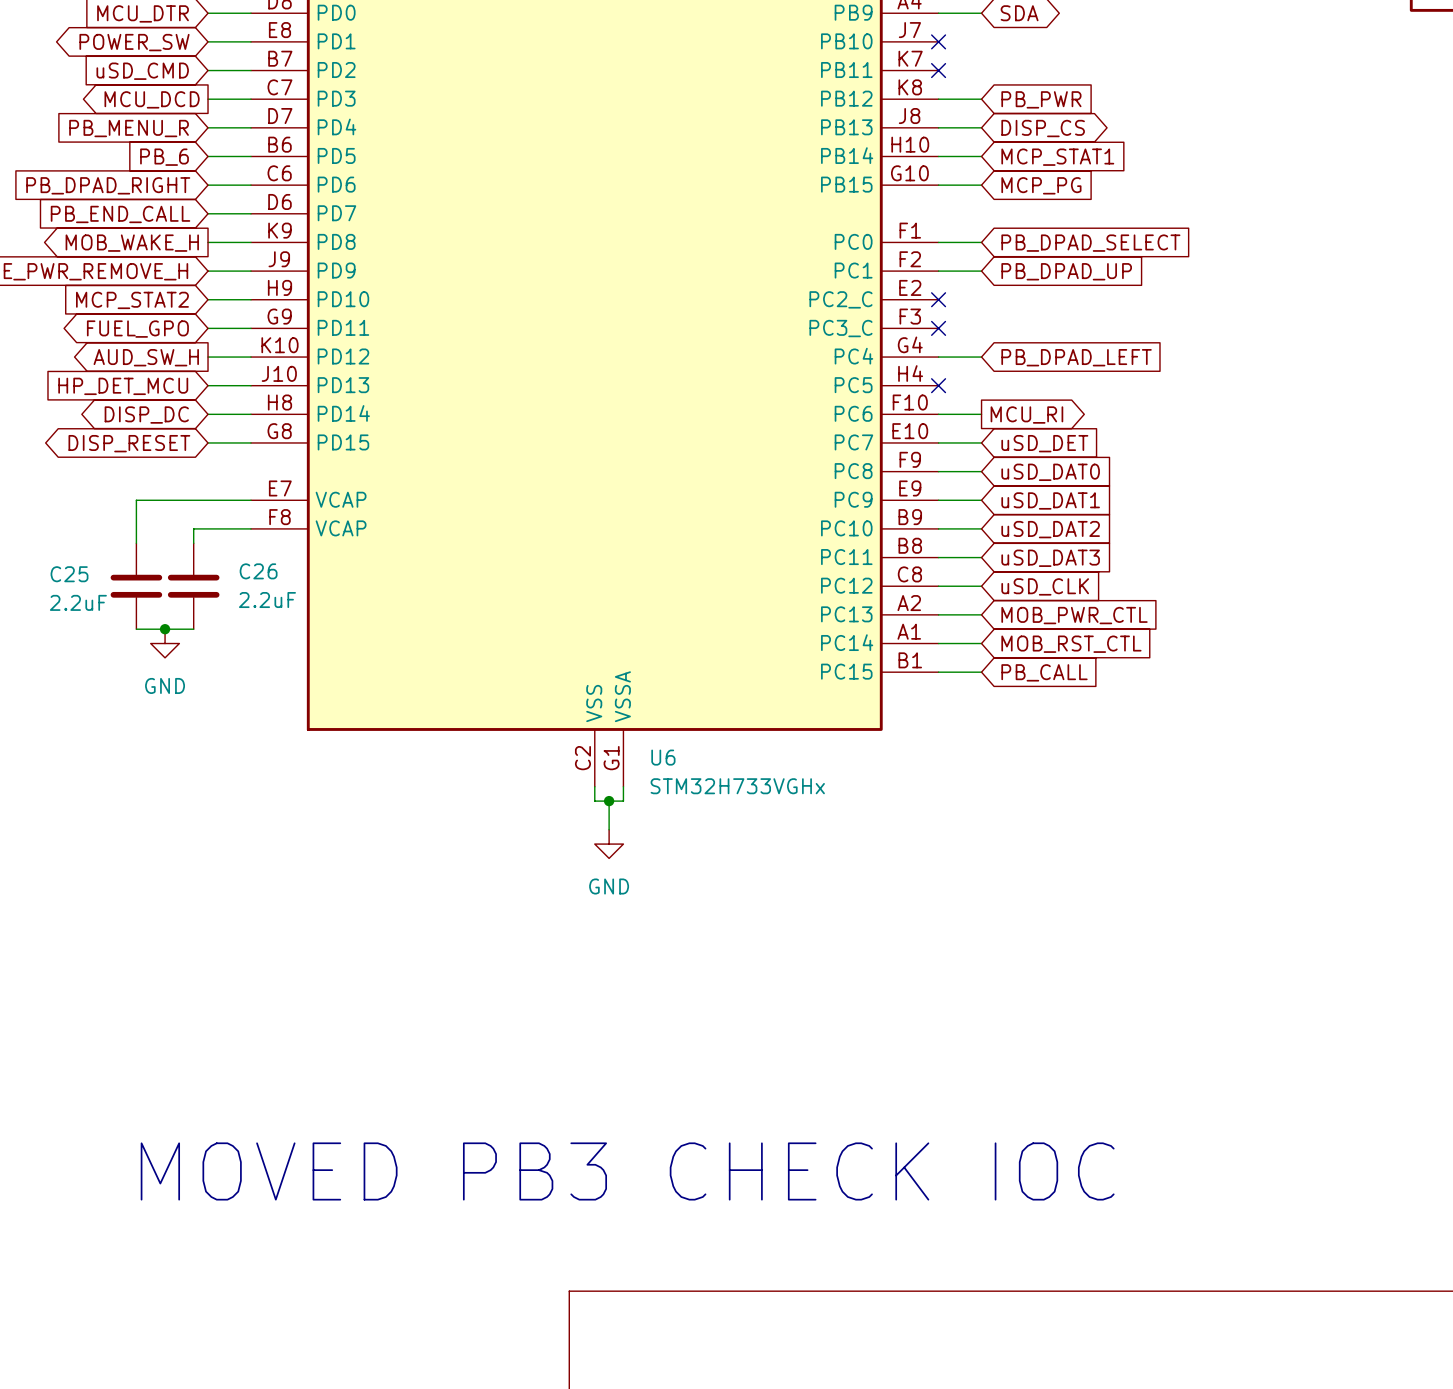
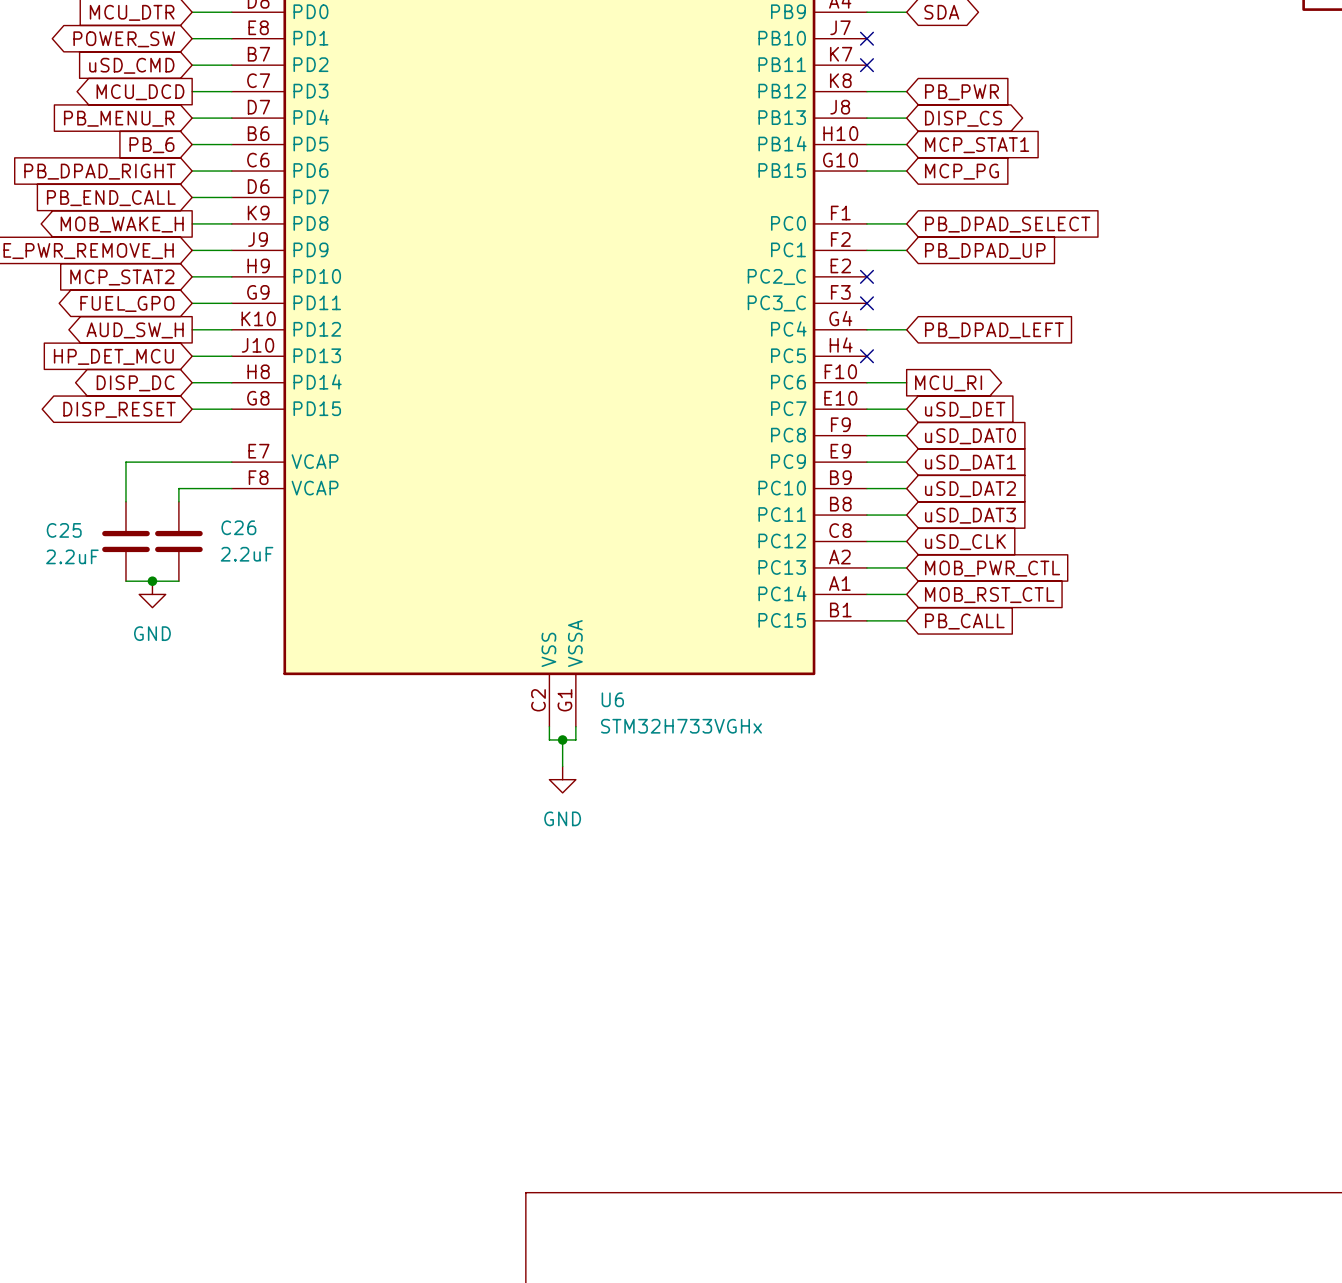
text: MOVED PB3 CHECK IOC (627, 1171) -> none

